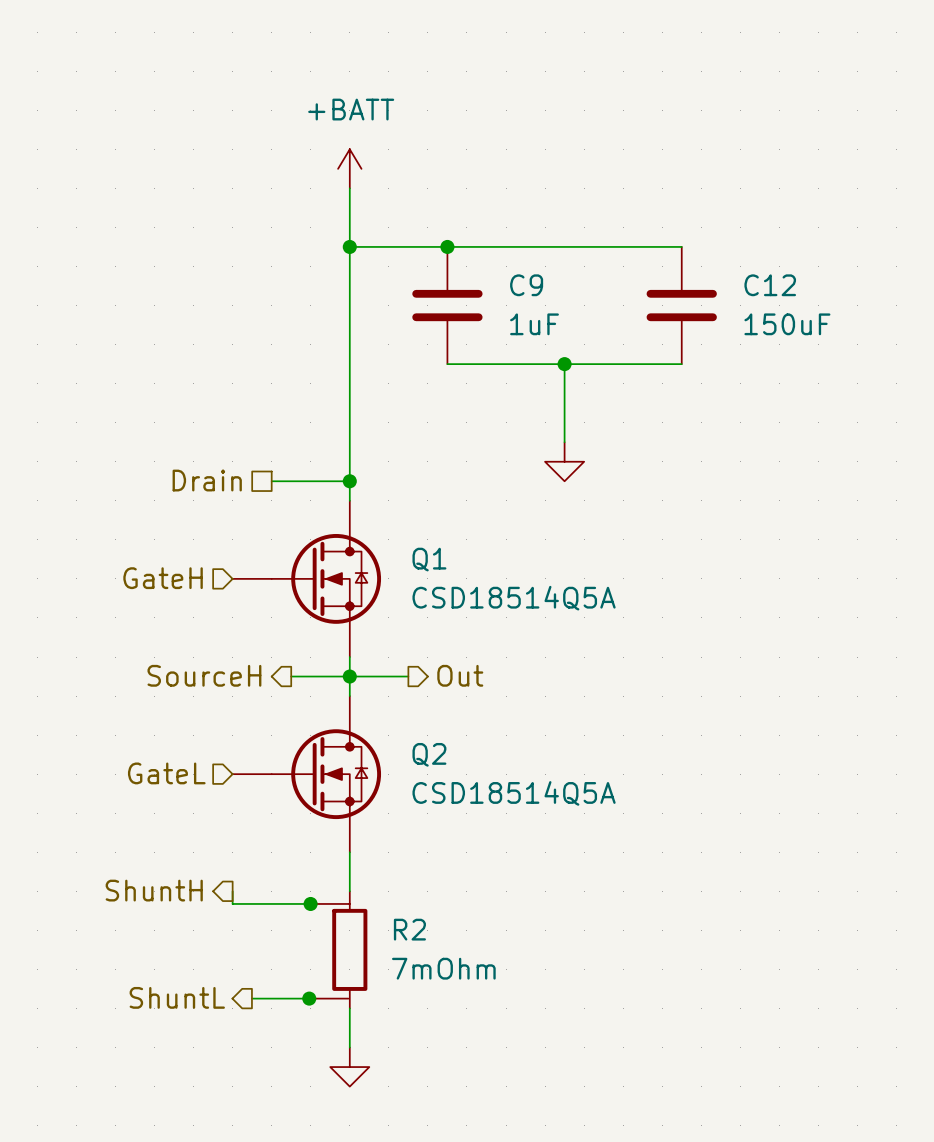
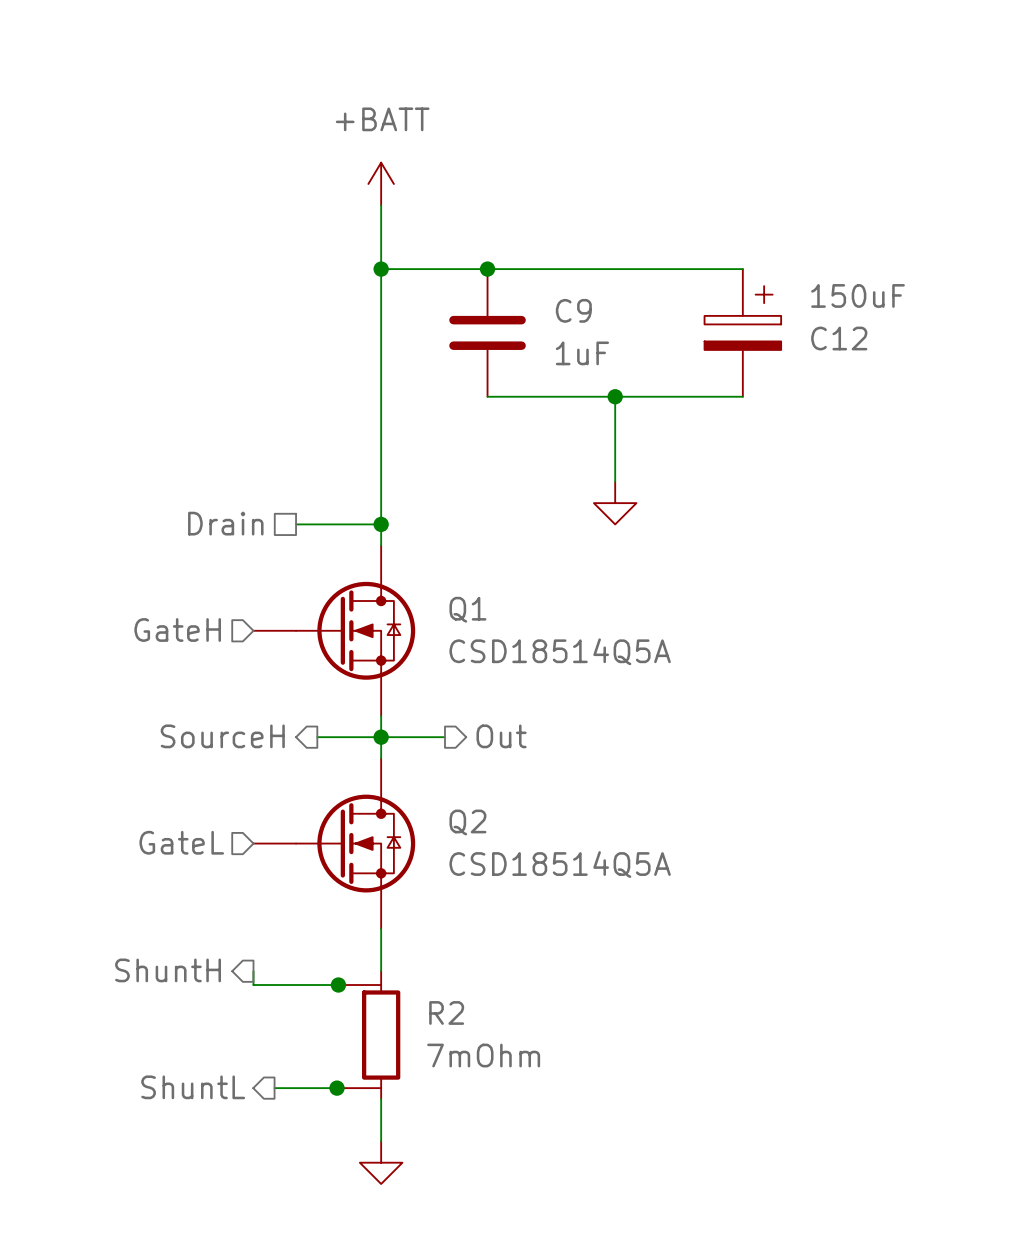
C12 symbol: [646, 246, 717, 365] -> [704, 269, 782, 397]
C12 value position: 150uF (787, 324) -> 150uF (858, 295)

